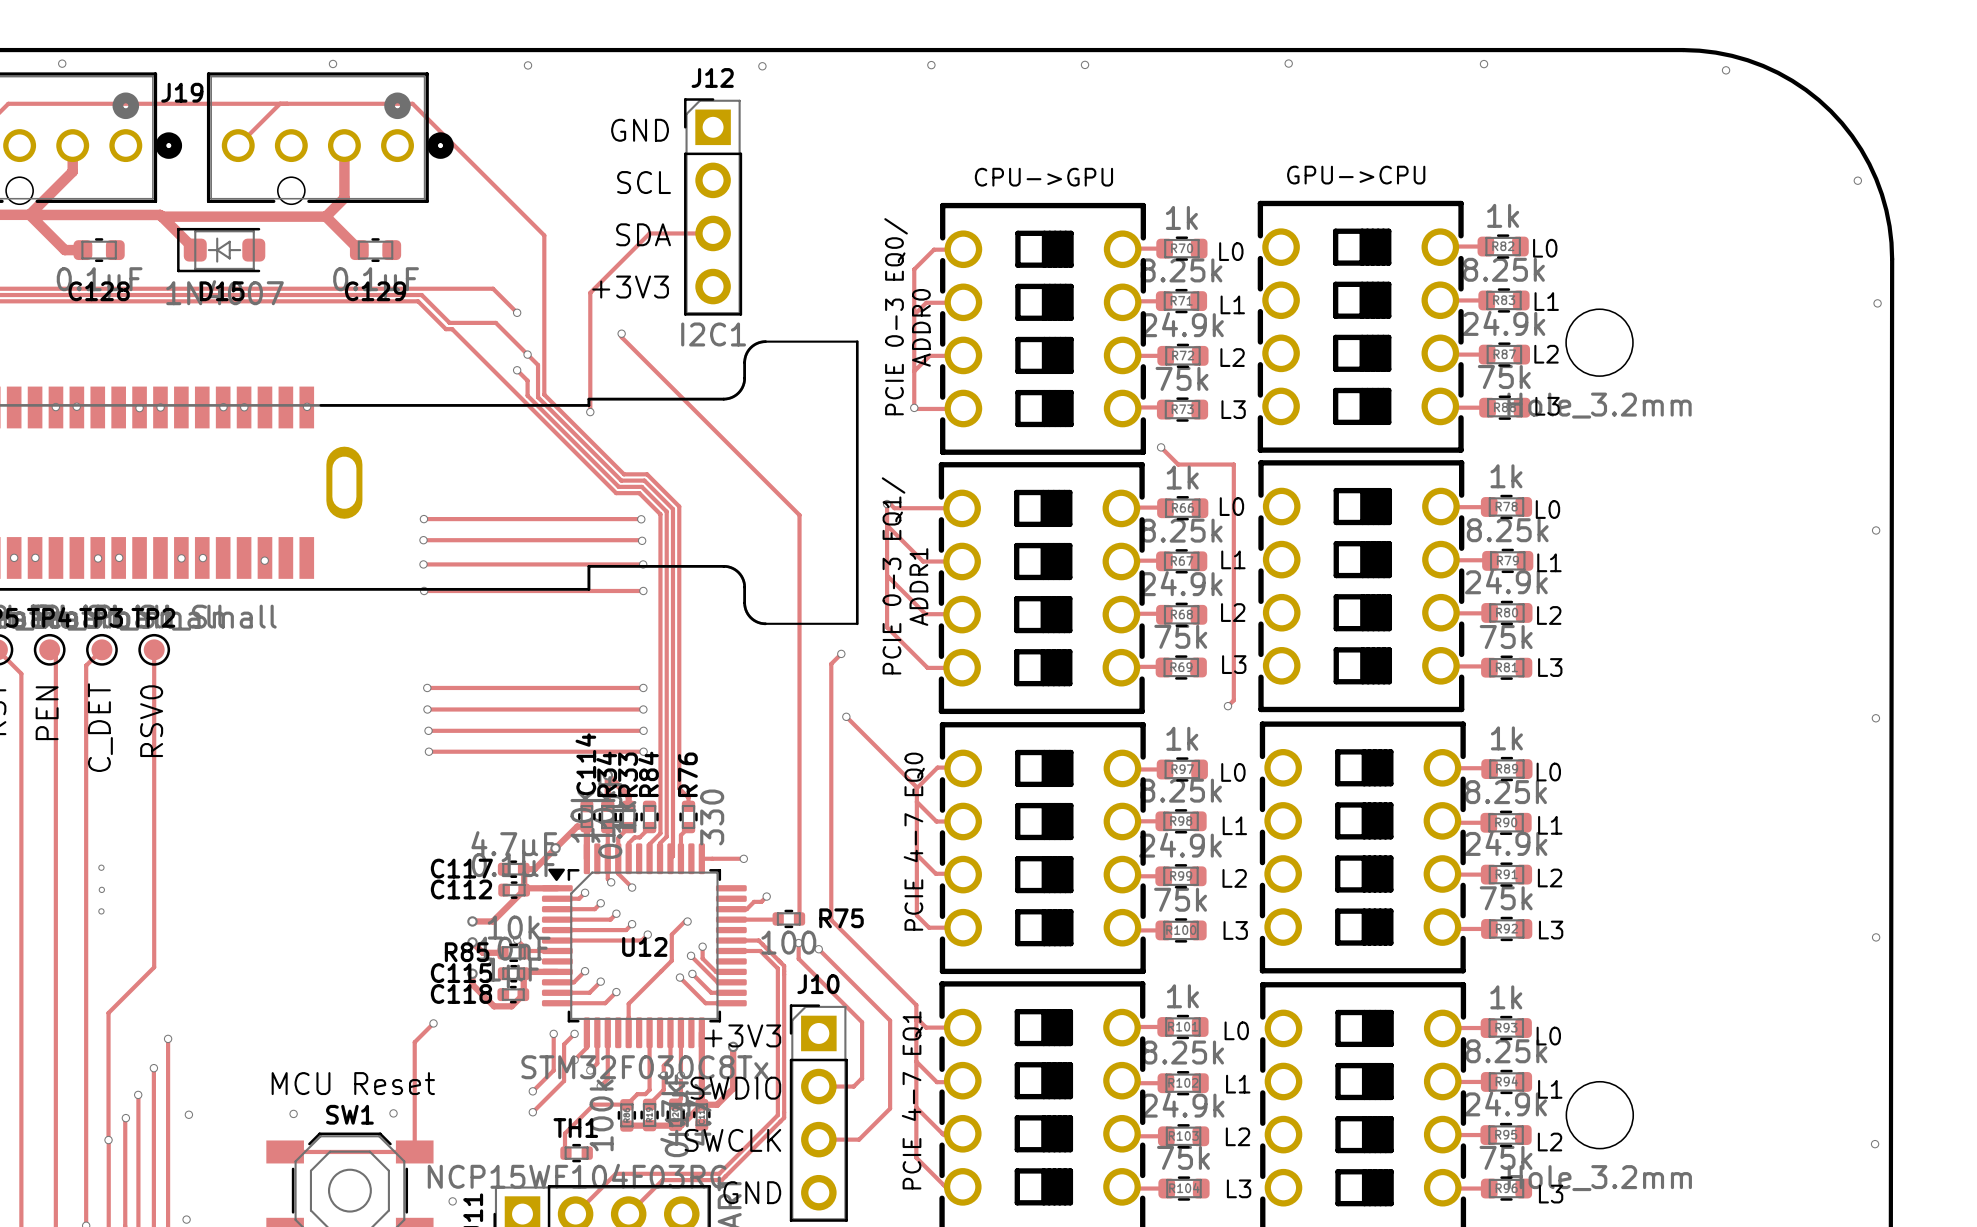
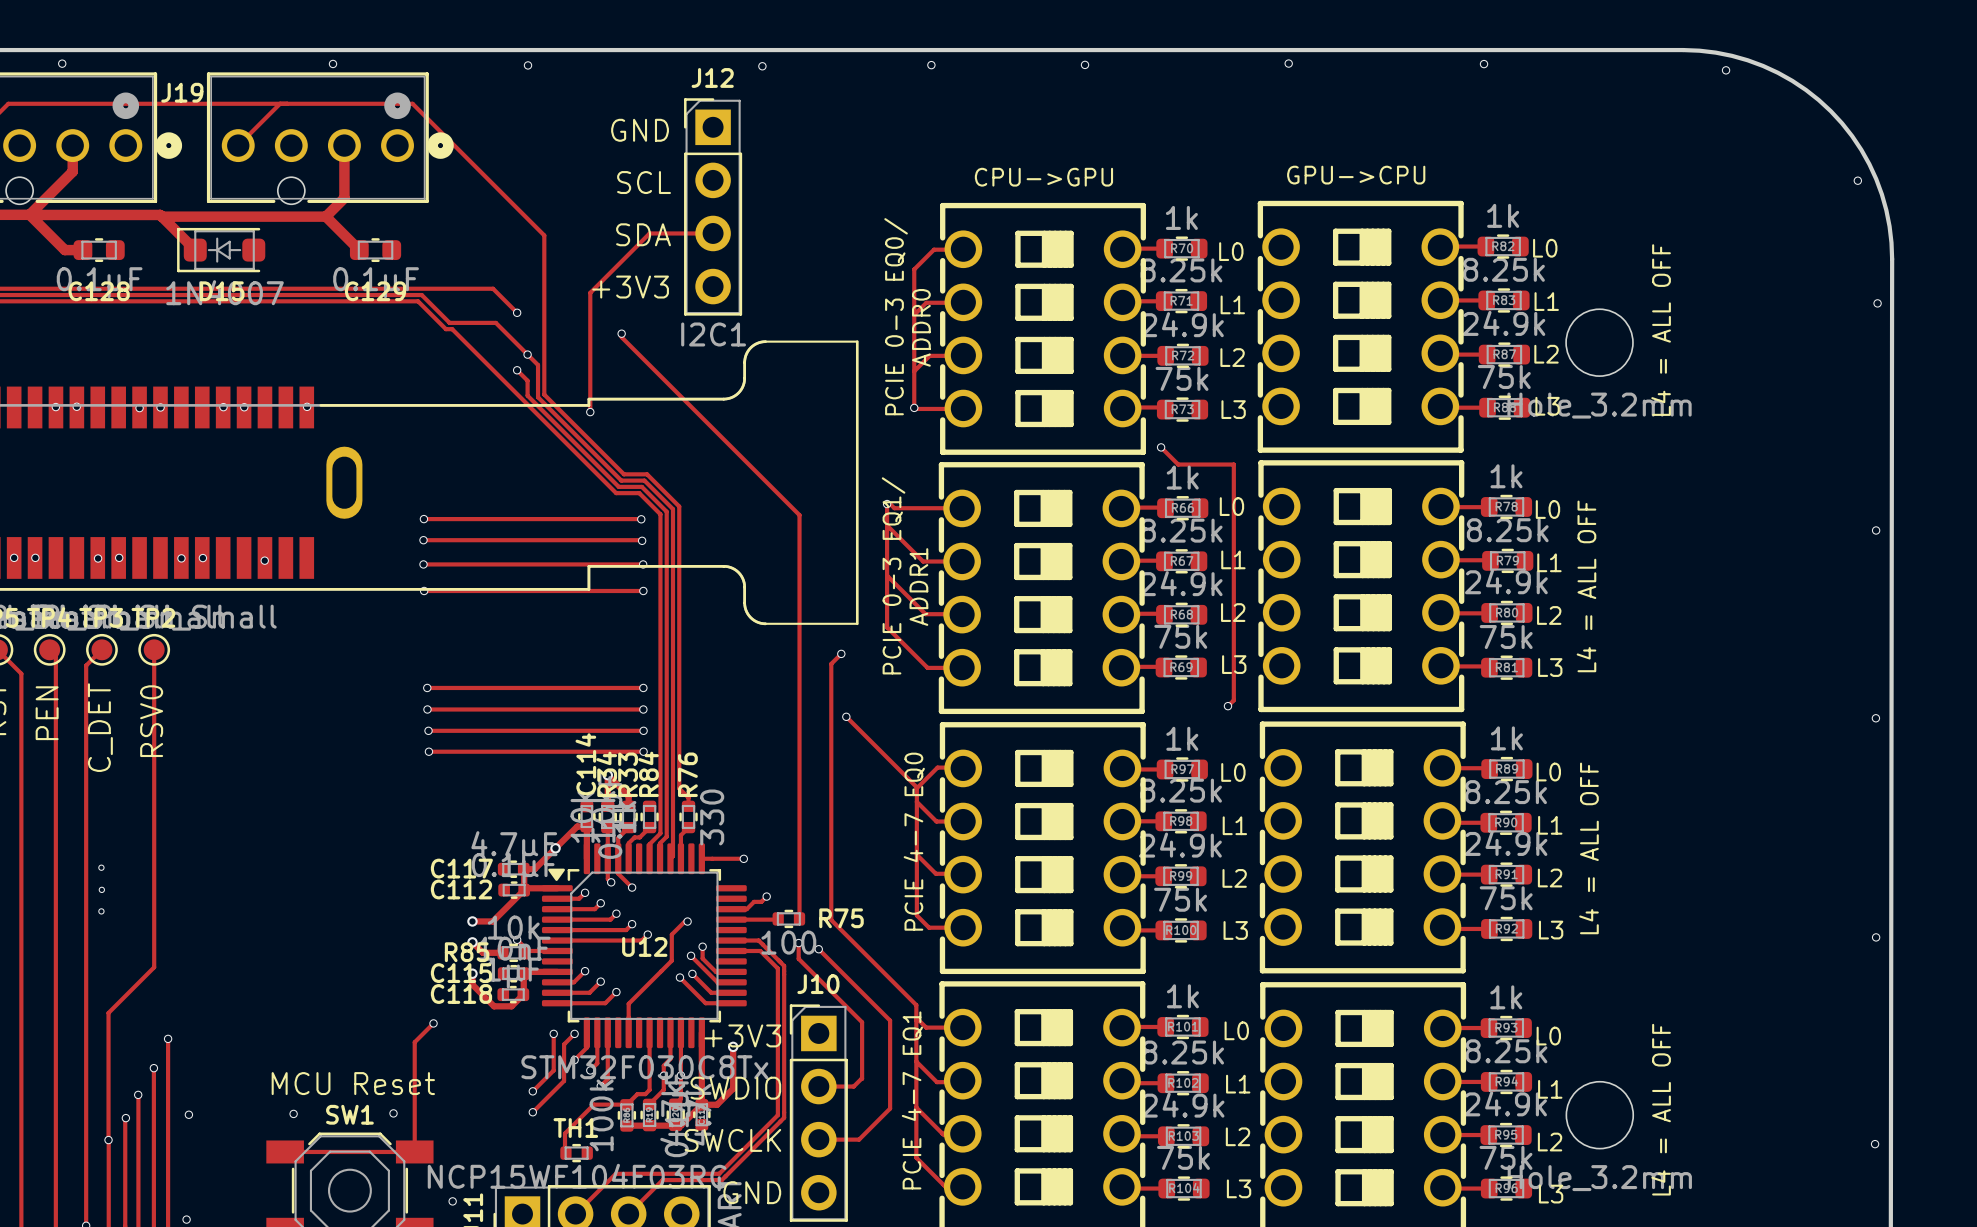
text: none -> L4 = ALL OFF (1661, 330)
text: none -> L4 = ALL OFF (1586, 586)
text: none -> L4 = ALL OFF (1589, 848)
text: none -> L4 = ALL OFF (1661, 1109)

